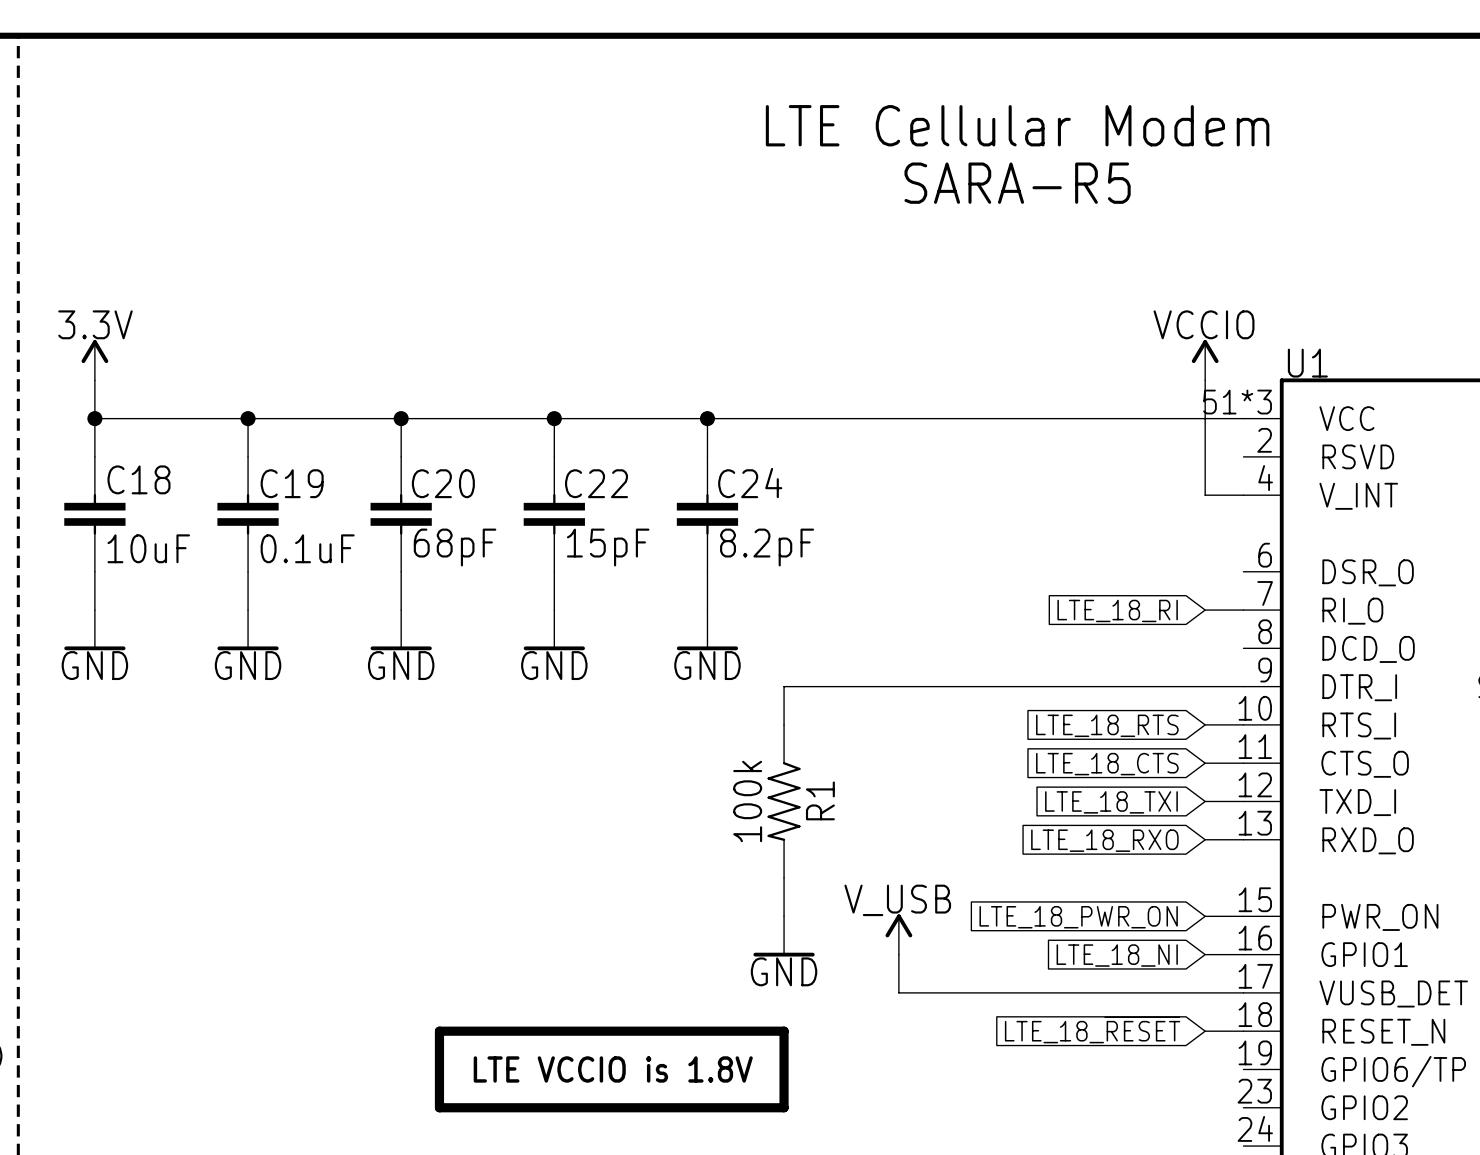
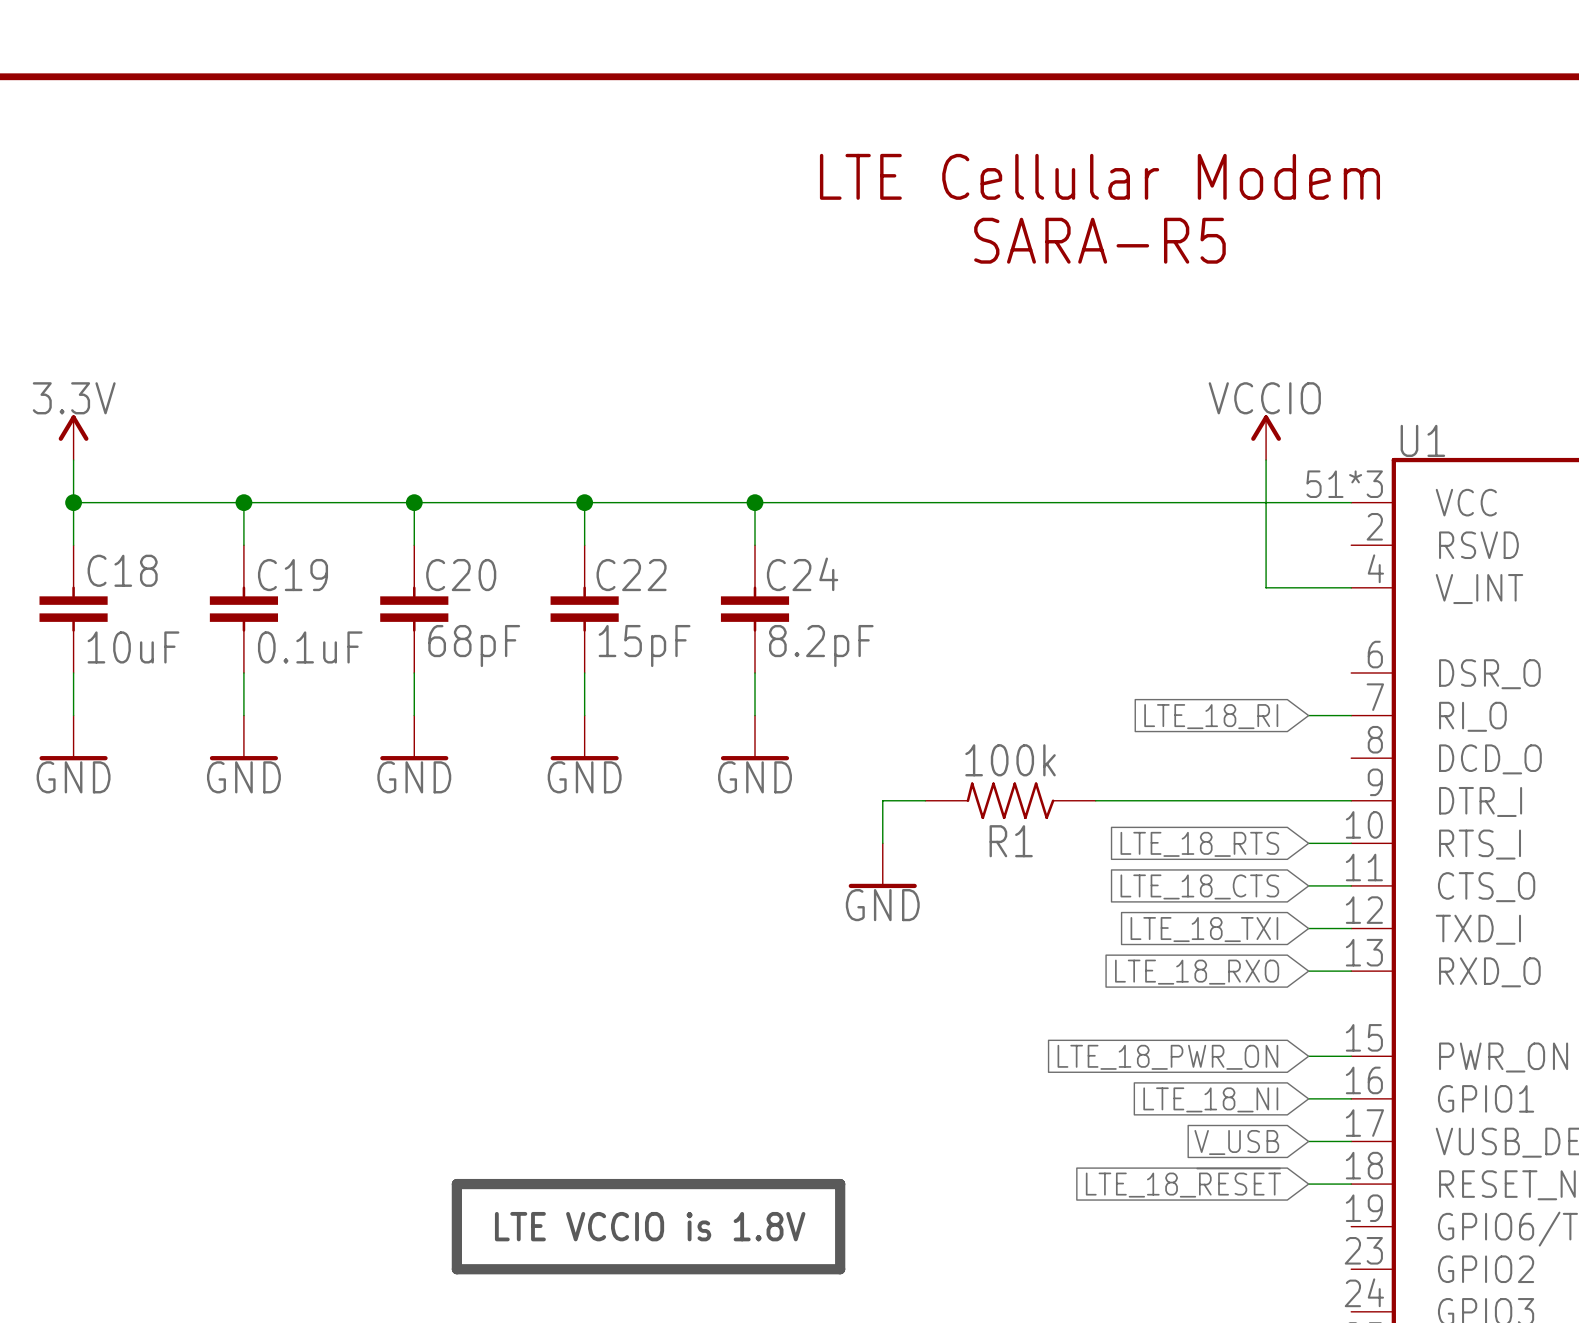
power symbol position: VCCIO (1205, 360) -> VCCIO (1266, 437)
wire: (1205, 380) (1205, 495) -> (1266, 460) (1266, 587) (1308, 587)
wire: (822, 686) (784, 686) (784, 724) -> (882, 800) (882, 843)
R1 rotation: 0° (784, 801) -> 90° clockwise (1010, 800)
R1 position: (784, 801) -> (1010, 800)
wire: (784, 878) (784, 916) -> none
power symbol: V_USB (898, 934) -> none
power symbol position: GND (784, 936) -> GND (882, 865)
wire: (898, 954) (898, 992) (1205, 992) -> none
global label: none -> V_USB (1236, 1142)

